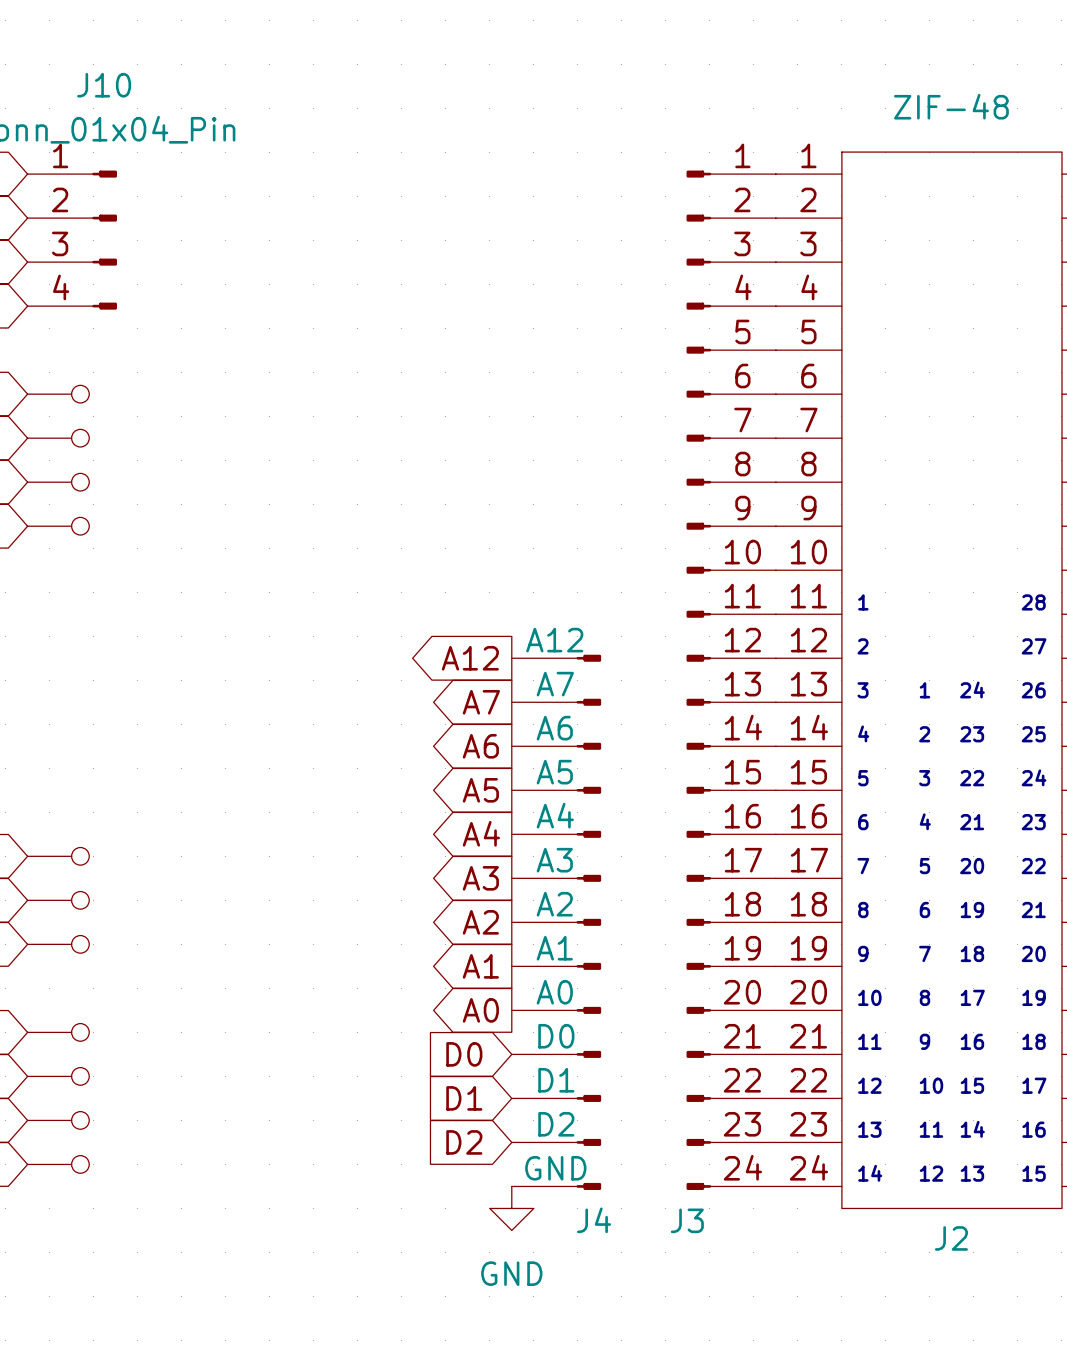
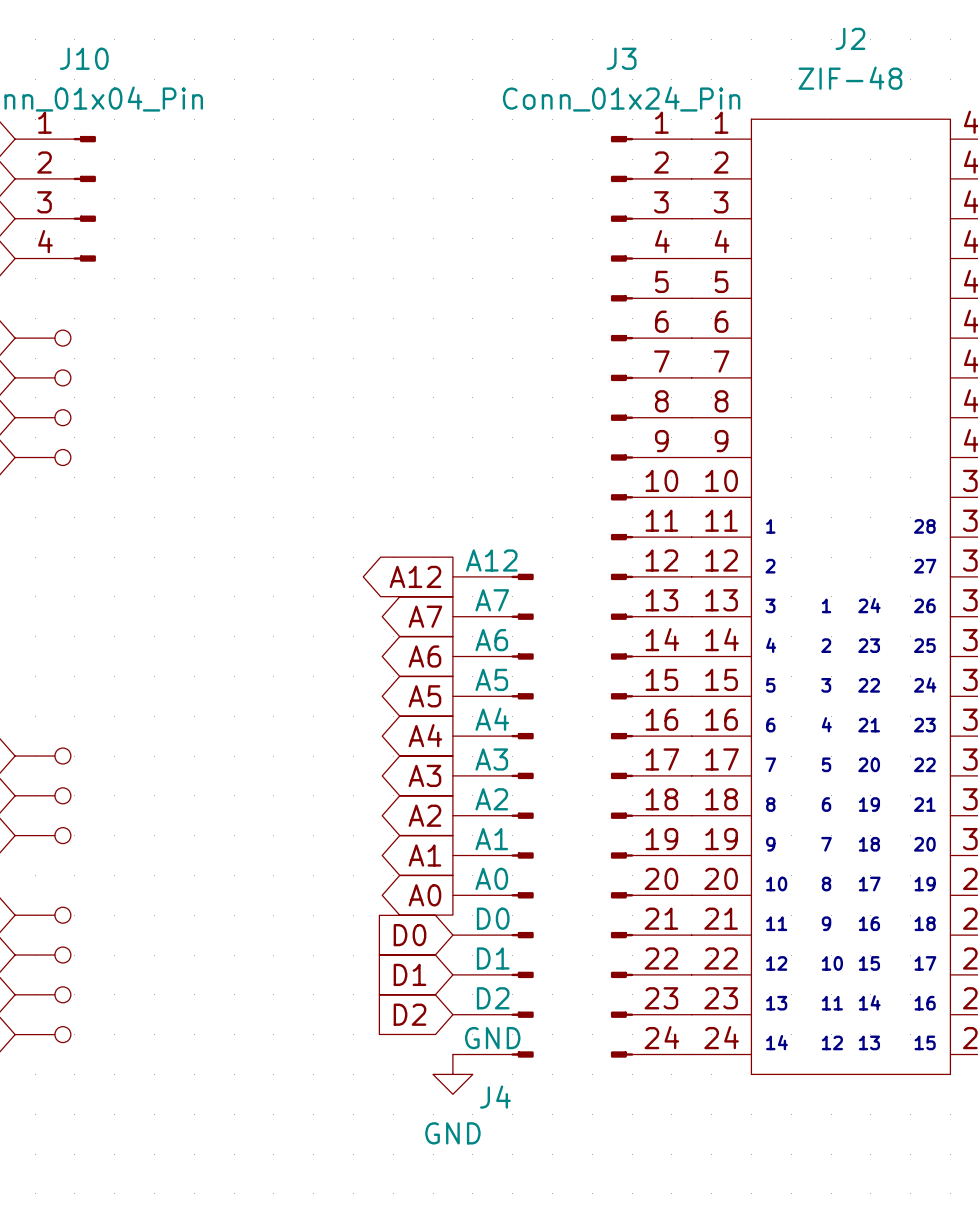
J3 value: none -> Conn_01x24_Pin (621, 99)
J4 name position: J4 (594, 1220) -> J4 (495, 1097)
J3 name position: J3 (687, 1220) -> J3 (621, 58)
J2 name position: J2 (951, 1238) -> J2 (850, 38)

